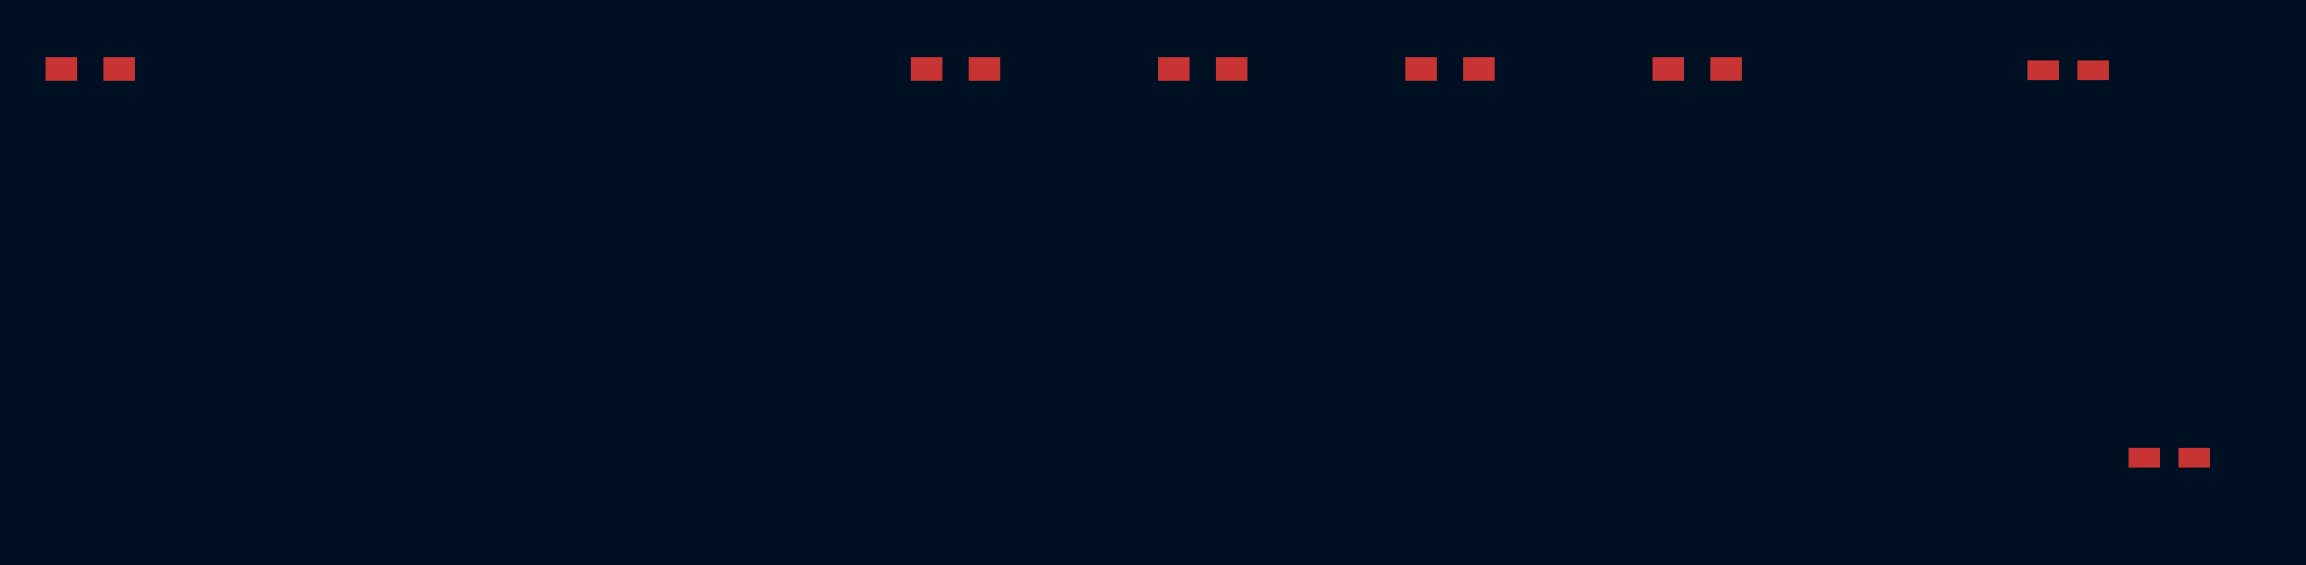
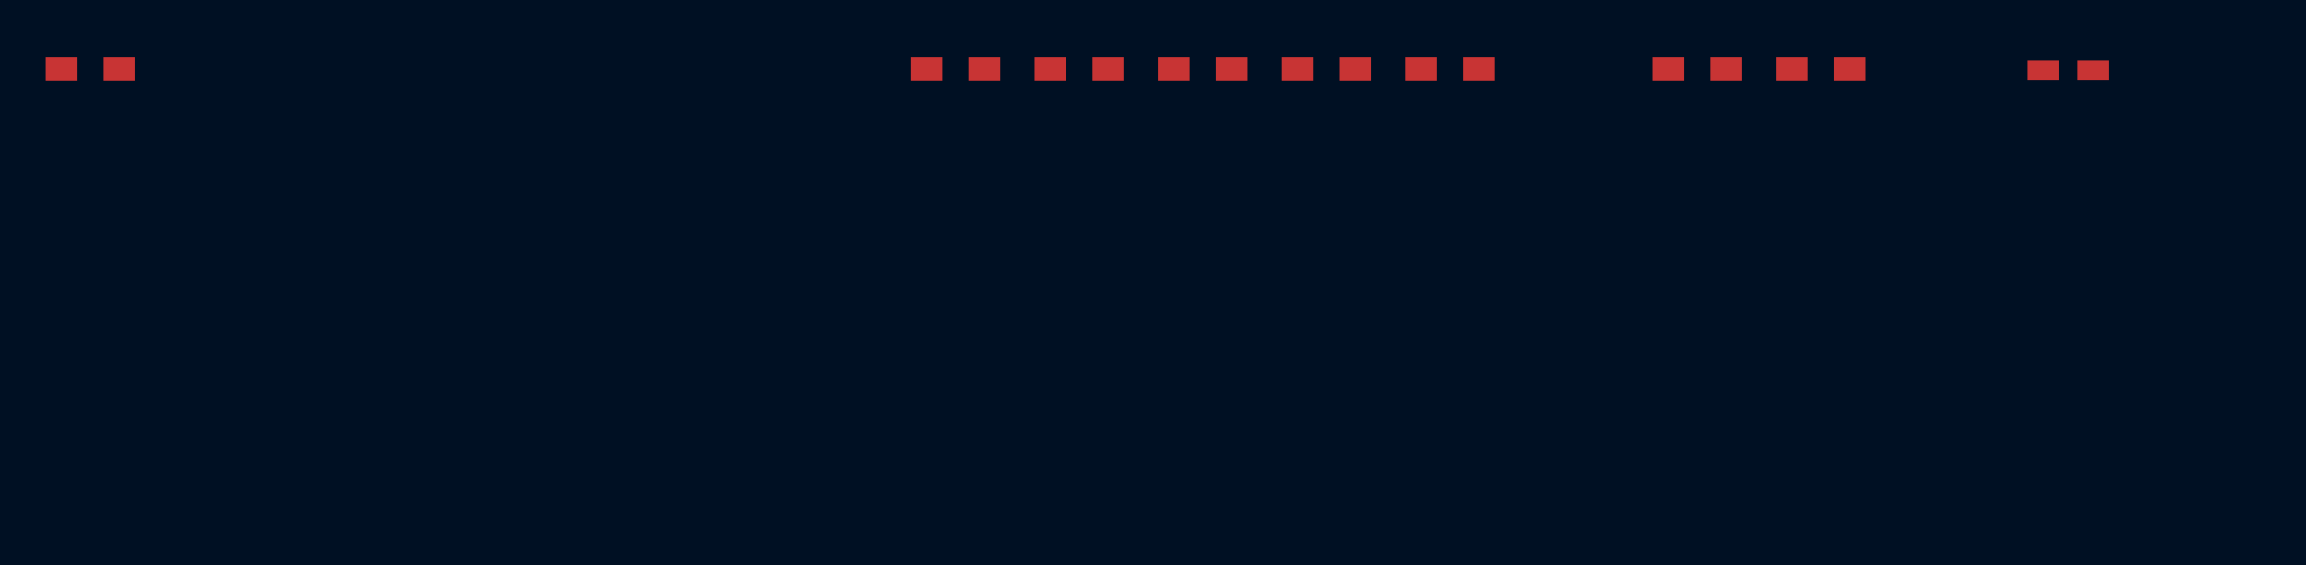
part: none -> (1079, 68)
part: none -> (1326, 68)
part: none -> (1820, 68)
part: (2169, 457) -> none

